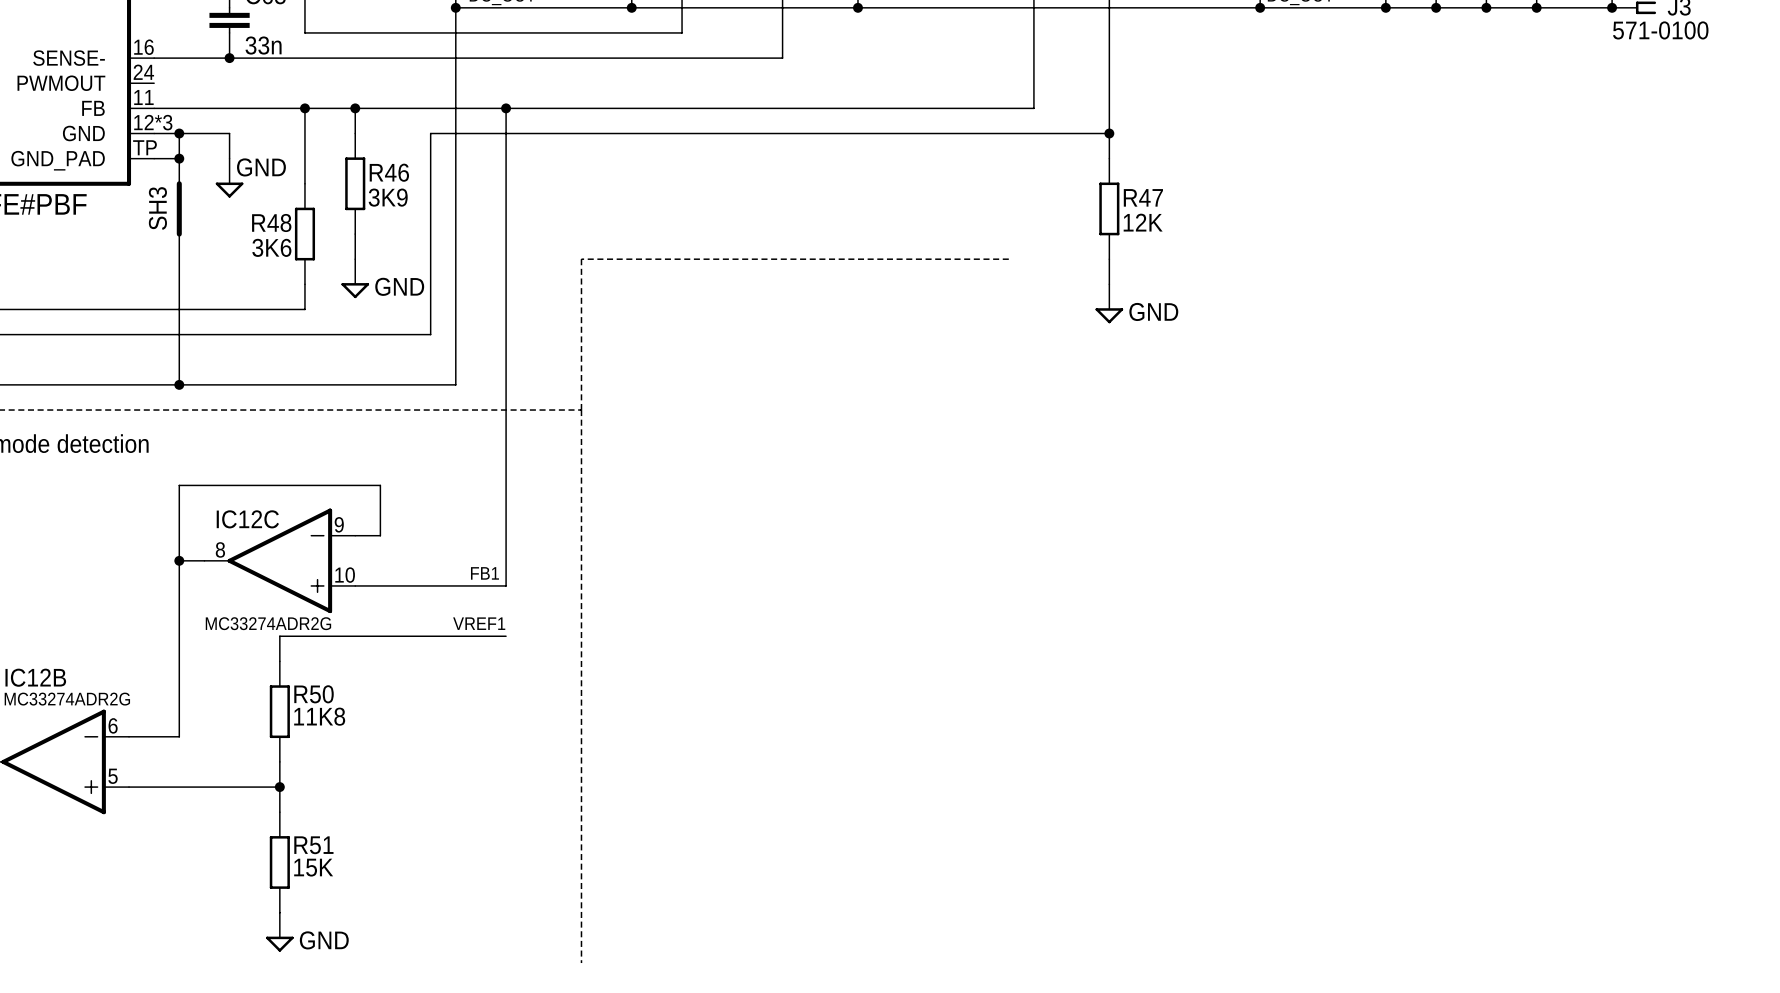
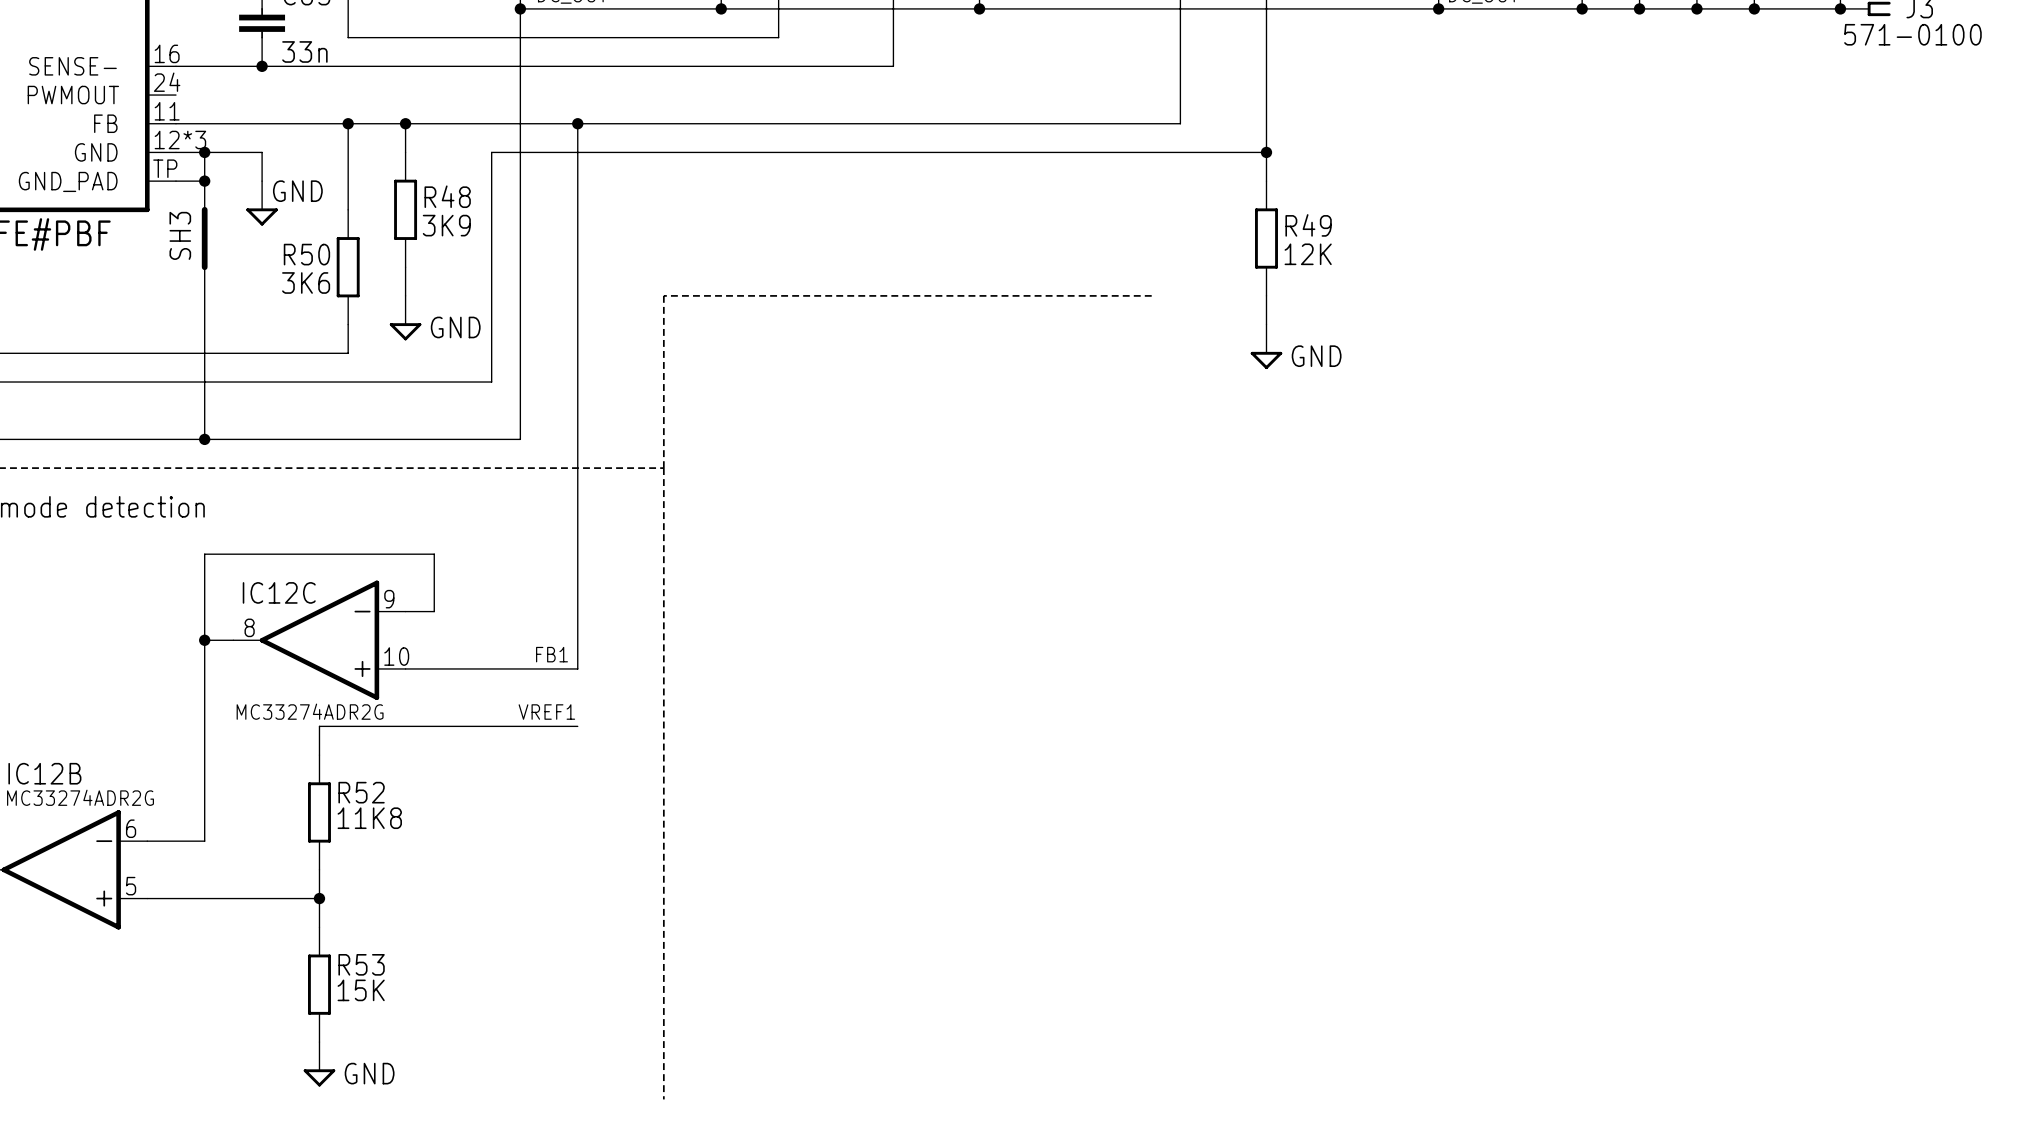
R46 name: R46 (389, 172) -> R48 (447, 196)
R47 name: R47 (1143, 197) -> R49 (1308, 225)
R48 name: R48 (271, 222) -> R50 (306, 254)
R50 name: R50 (314, 694) -> R52 (361, 792)
R51 name: R51 (313, 845) -> R53 (361, 964)

